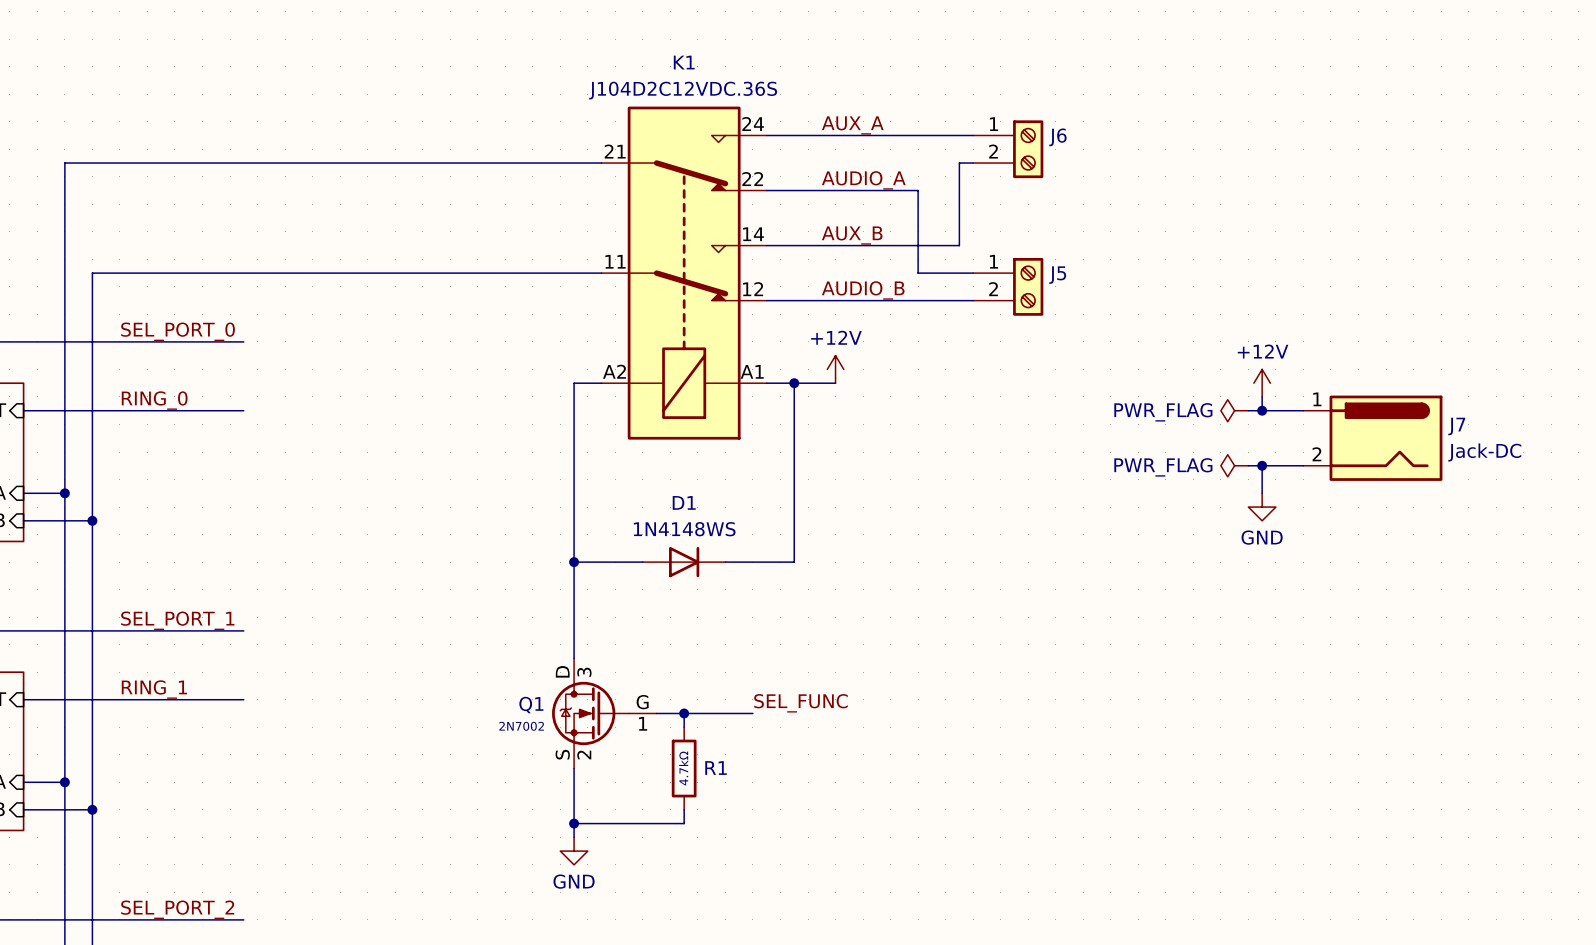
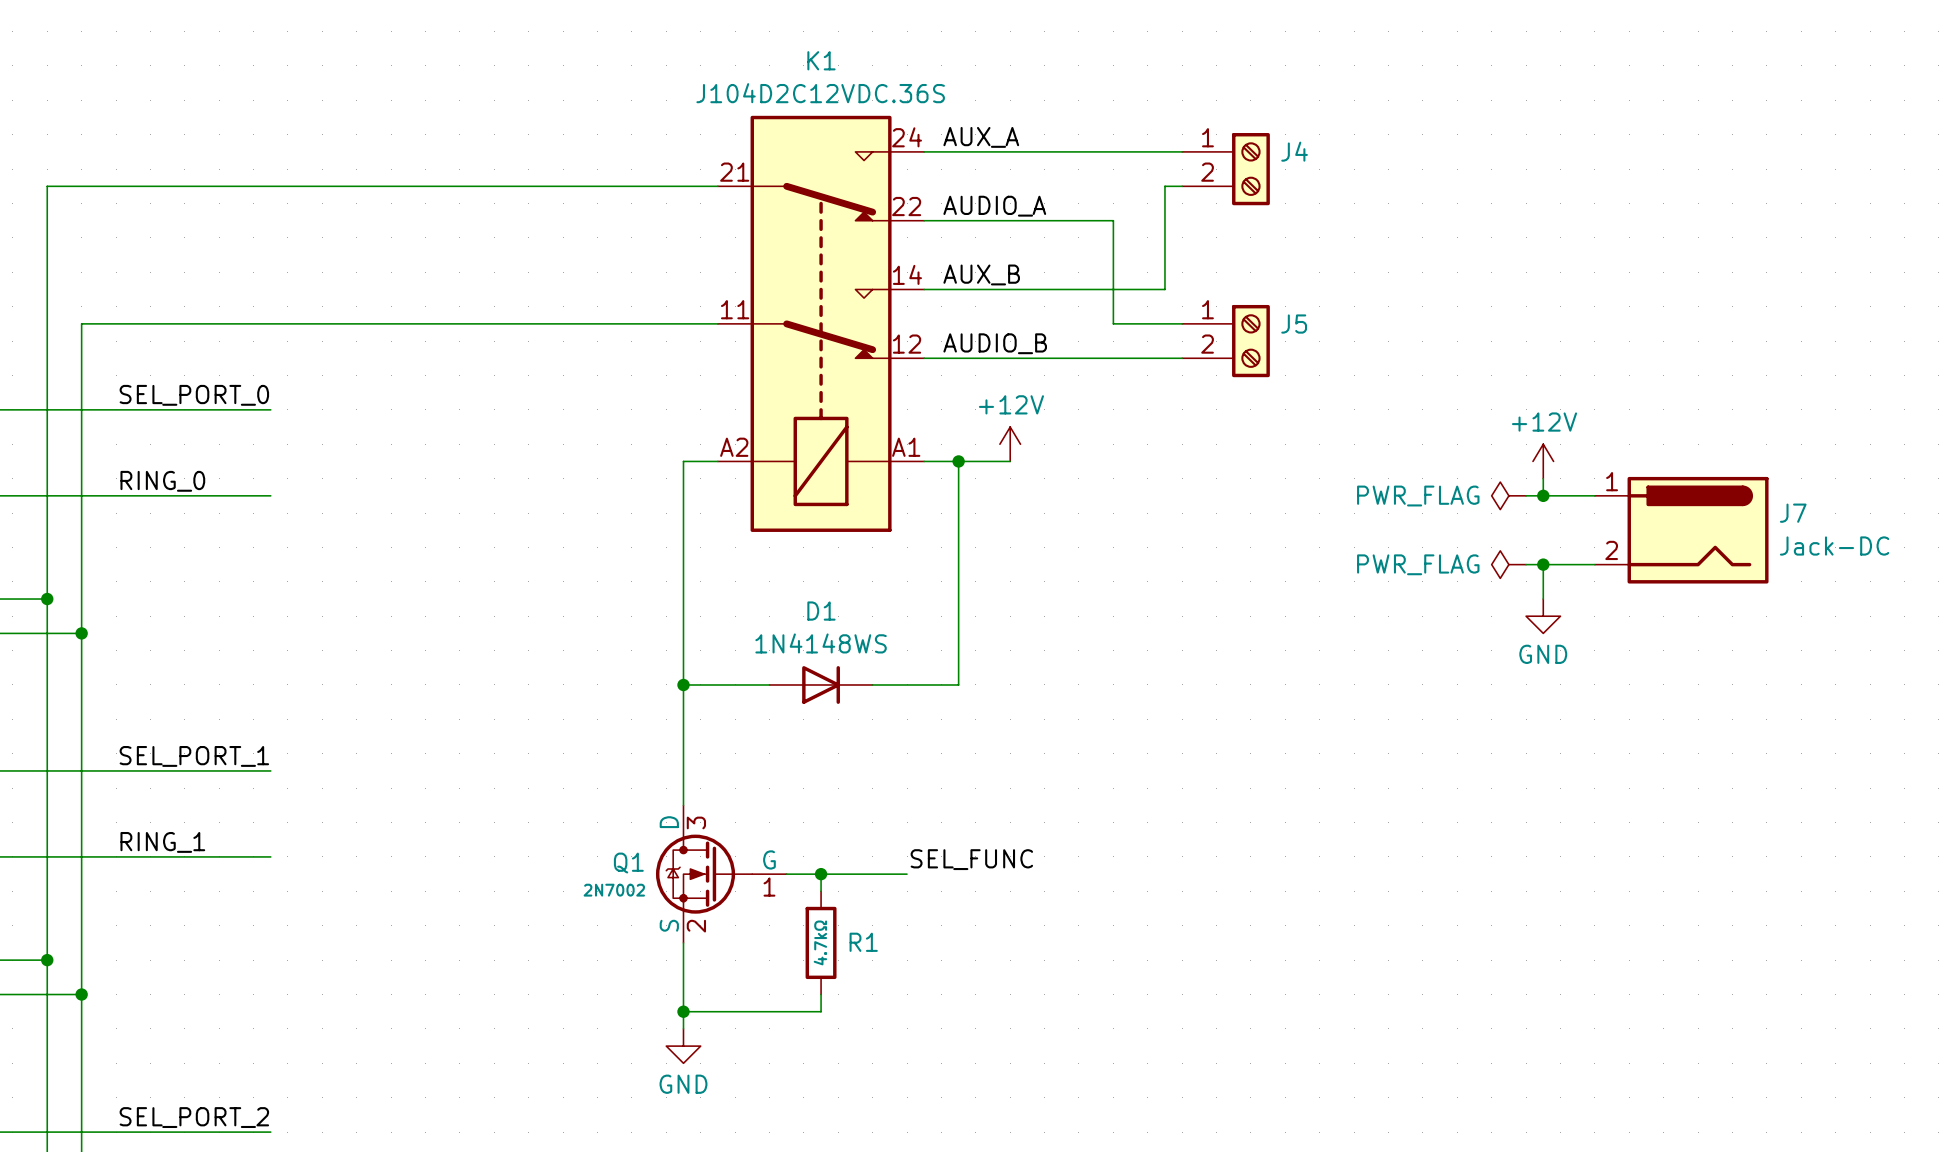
label position: AUX_A (852, 125) -> AUX_A (981, 137)
J6 name: J6 (1057, 137) -> J4 (1294, 151)
label position: AUDIO_A (863, 180) -> AUDIO_A (994, 206)
label position: AUX_B (852, 235) -> AUX_B (981, 274)
label position: AUDIO_B (863, 290) -> AUDIO_B (995, 343)

